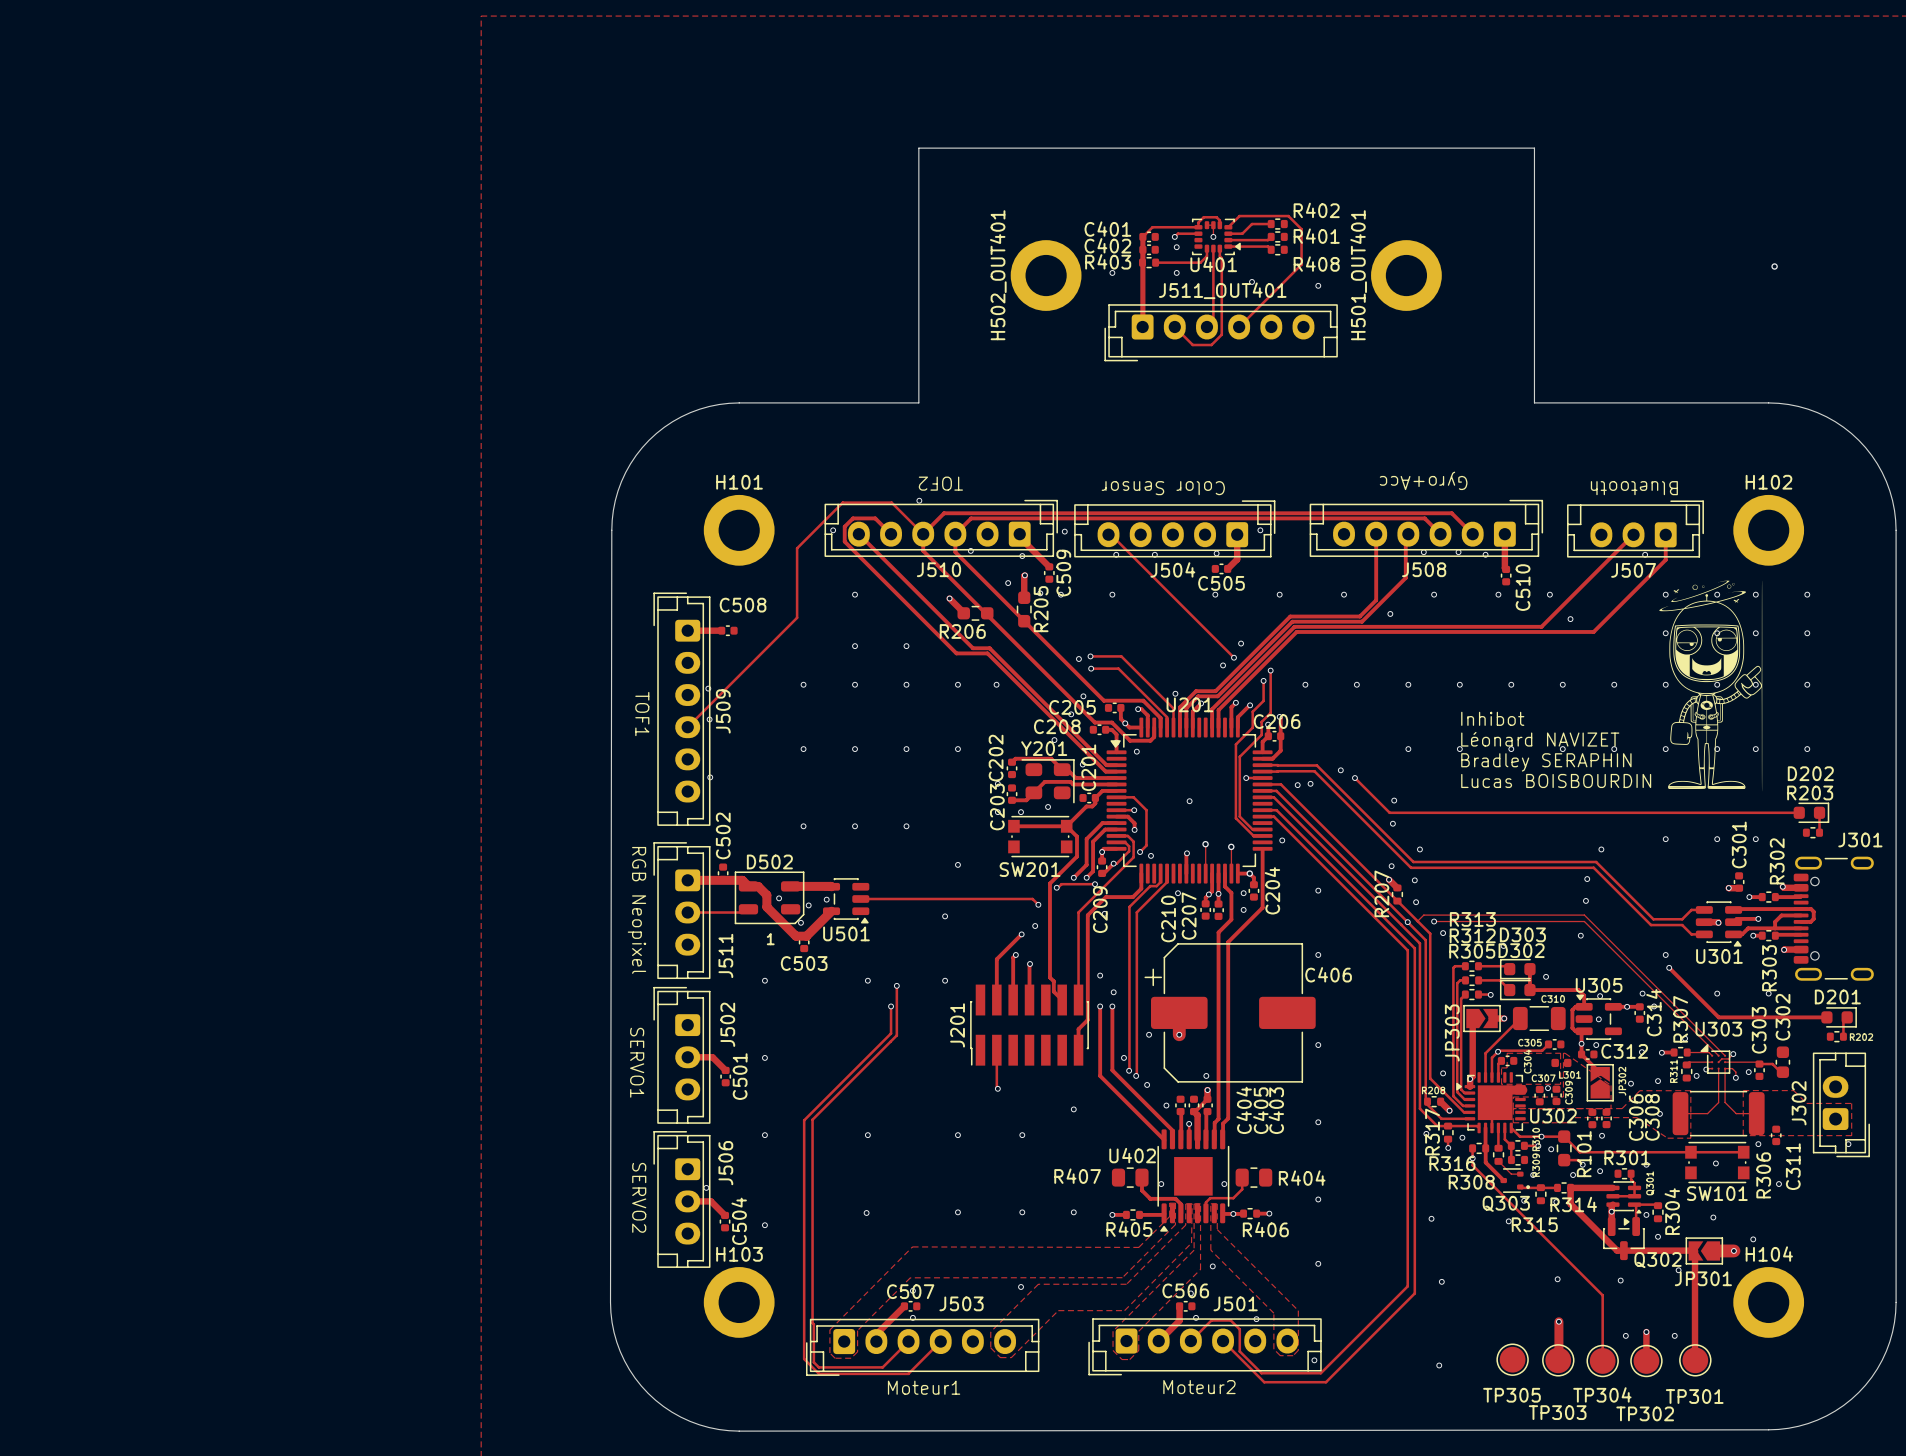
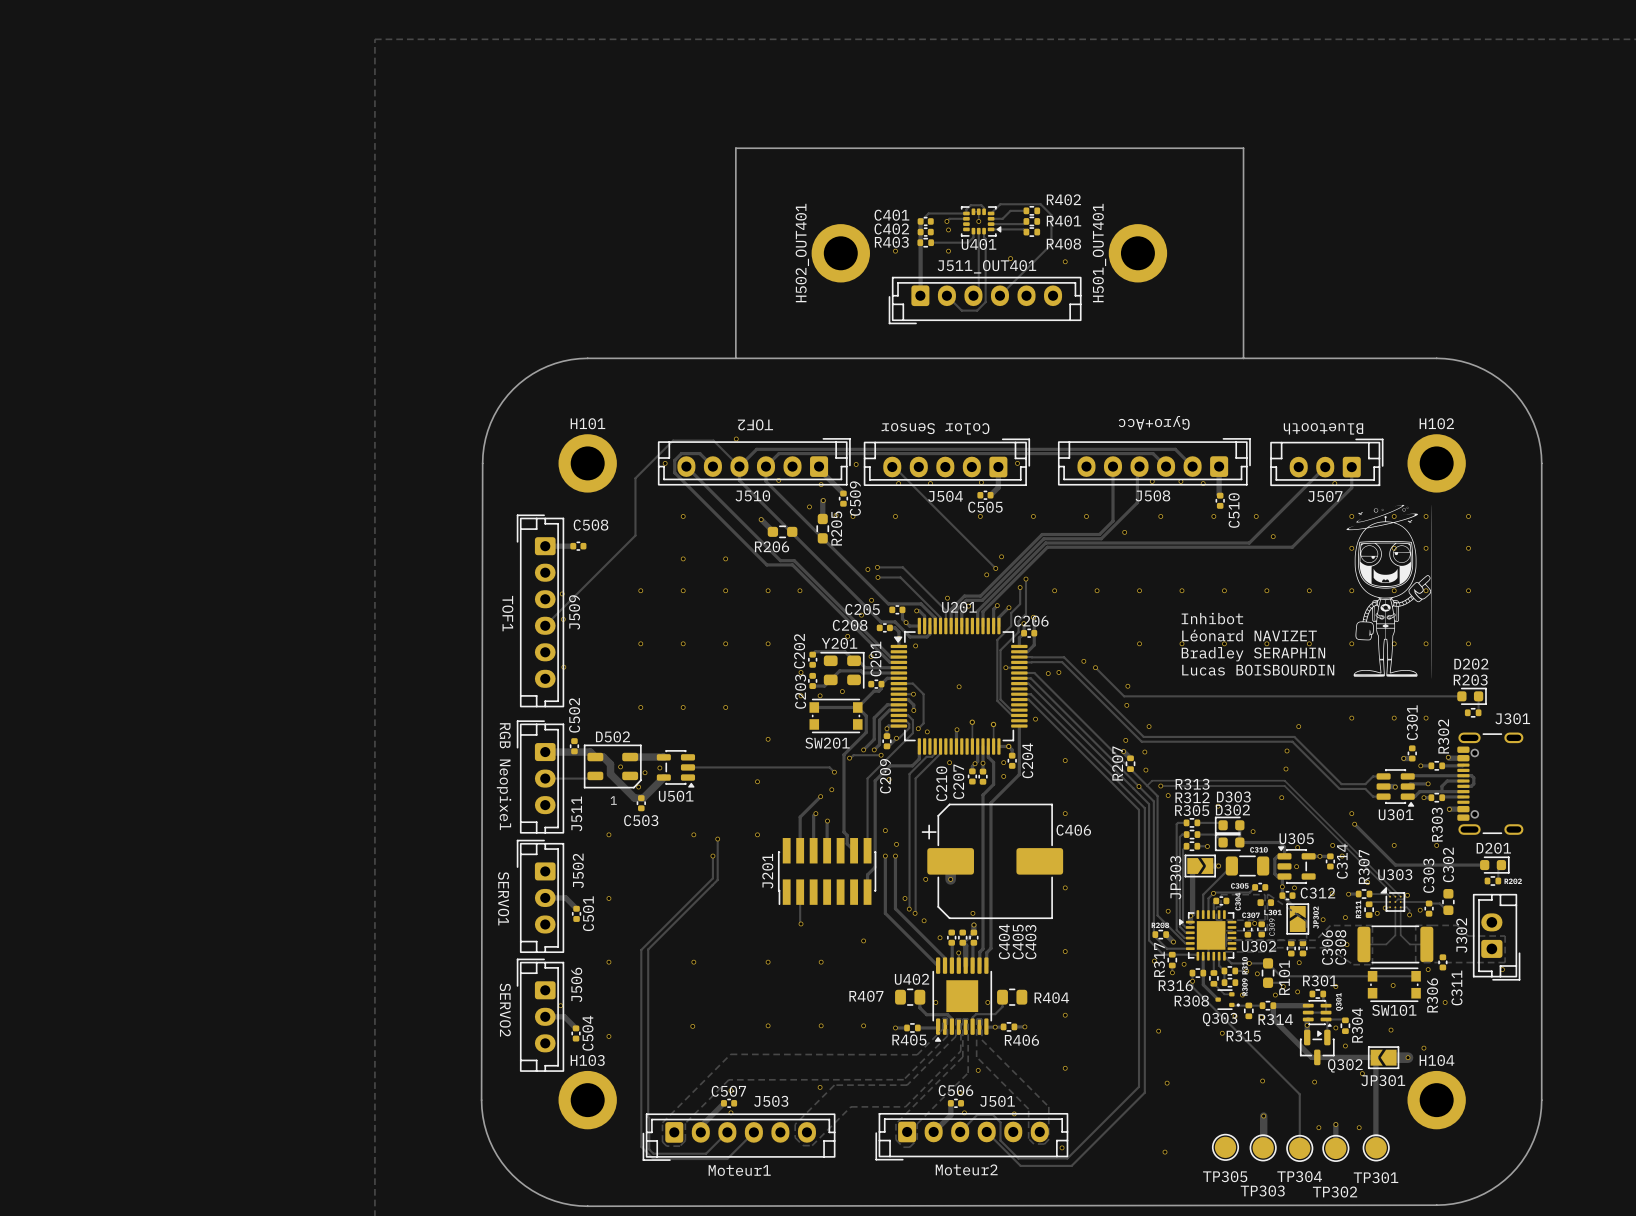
via: (1774, 266) -> none
board edge: none -> (735, 358) (1243, 358)
track: (1507, 1090) (1522, 1090) -> none

